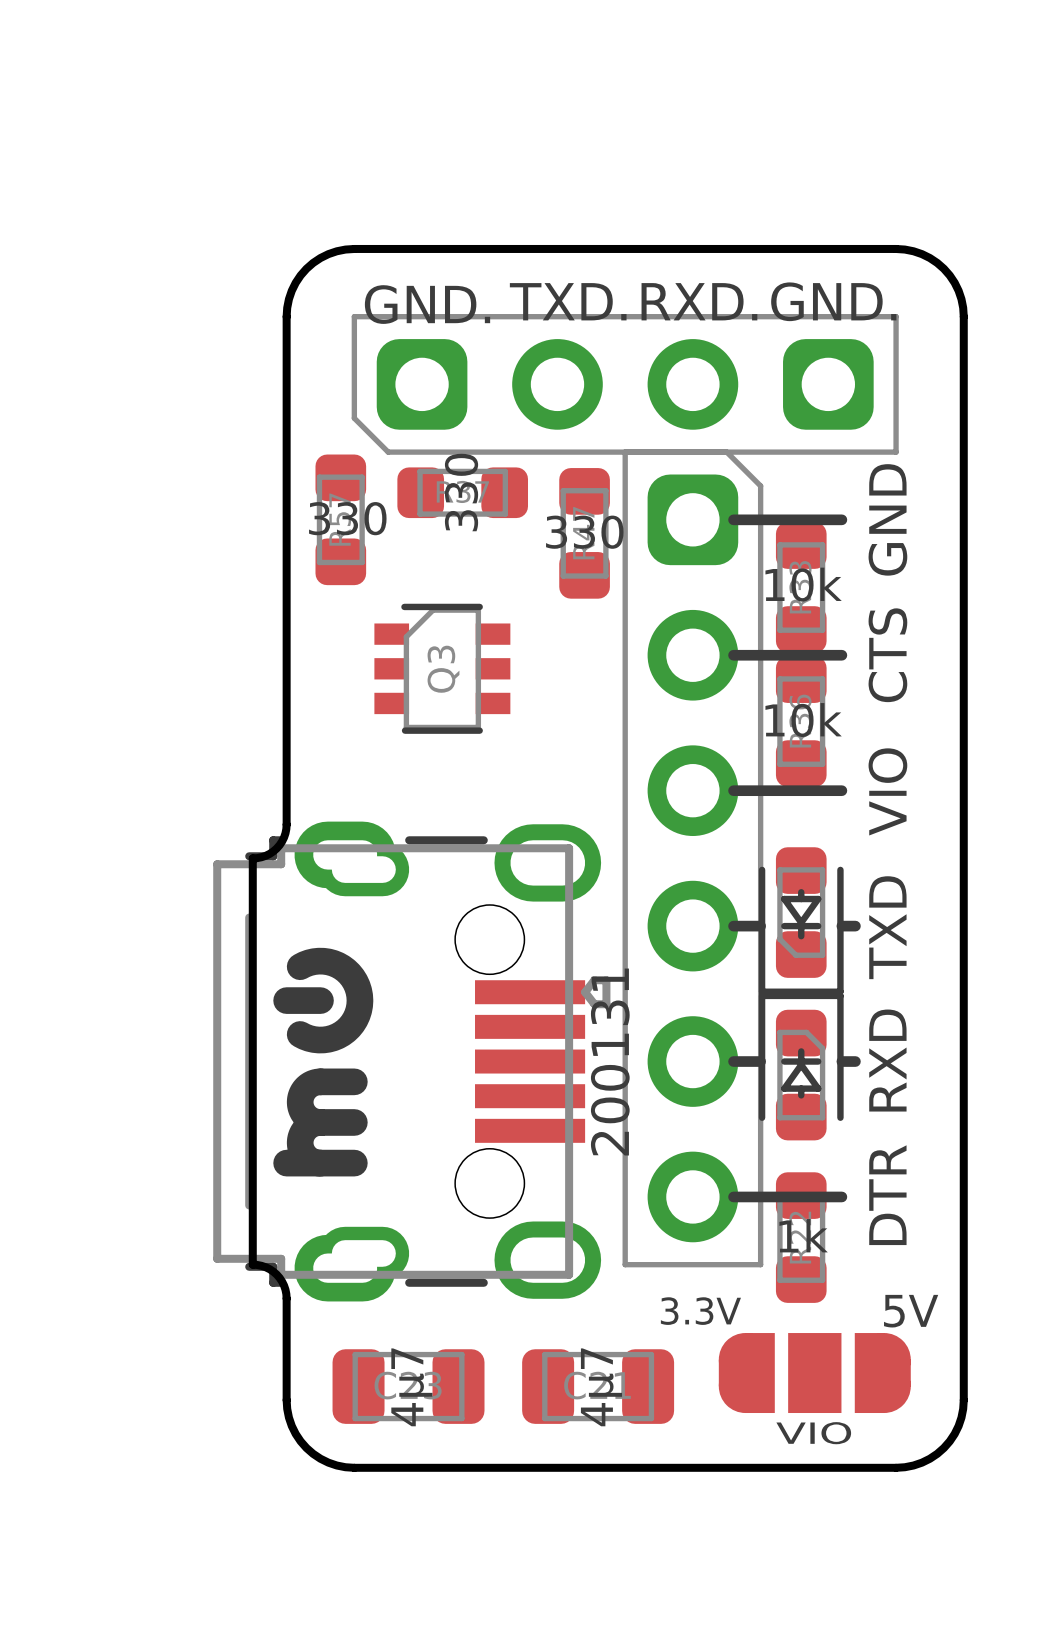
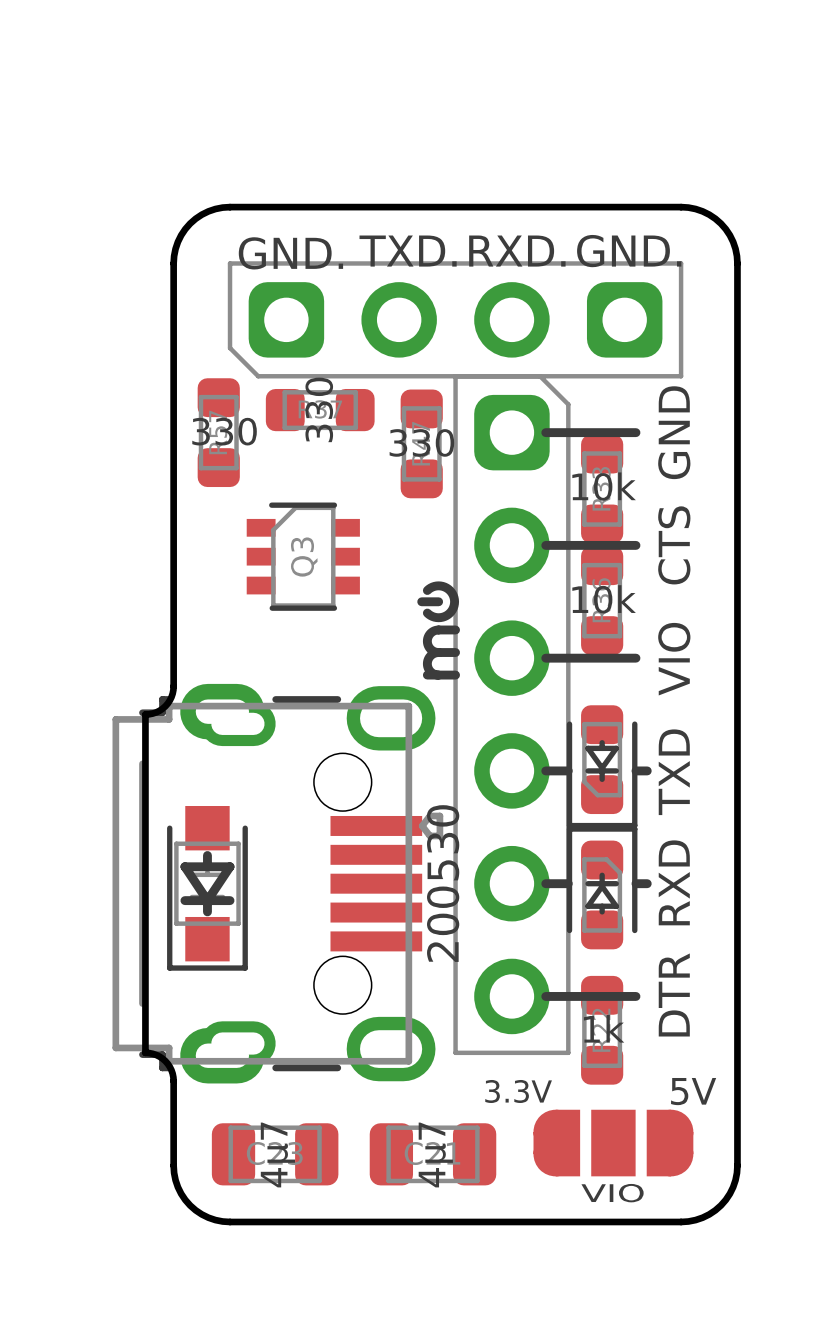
drawing: none -> [417, 581, 460, 680]
drawing: [273, 947, 374, 1177] -> none
text: 200131 (610, 1062) -> 200530 (443, 883)
part: none -> (207, 888)

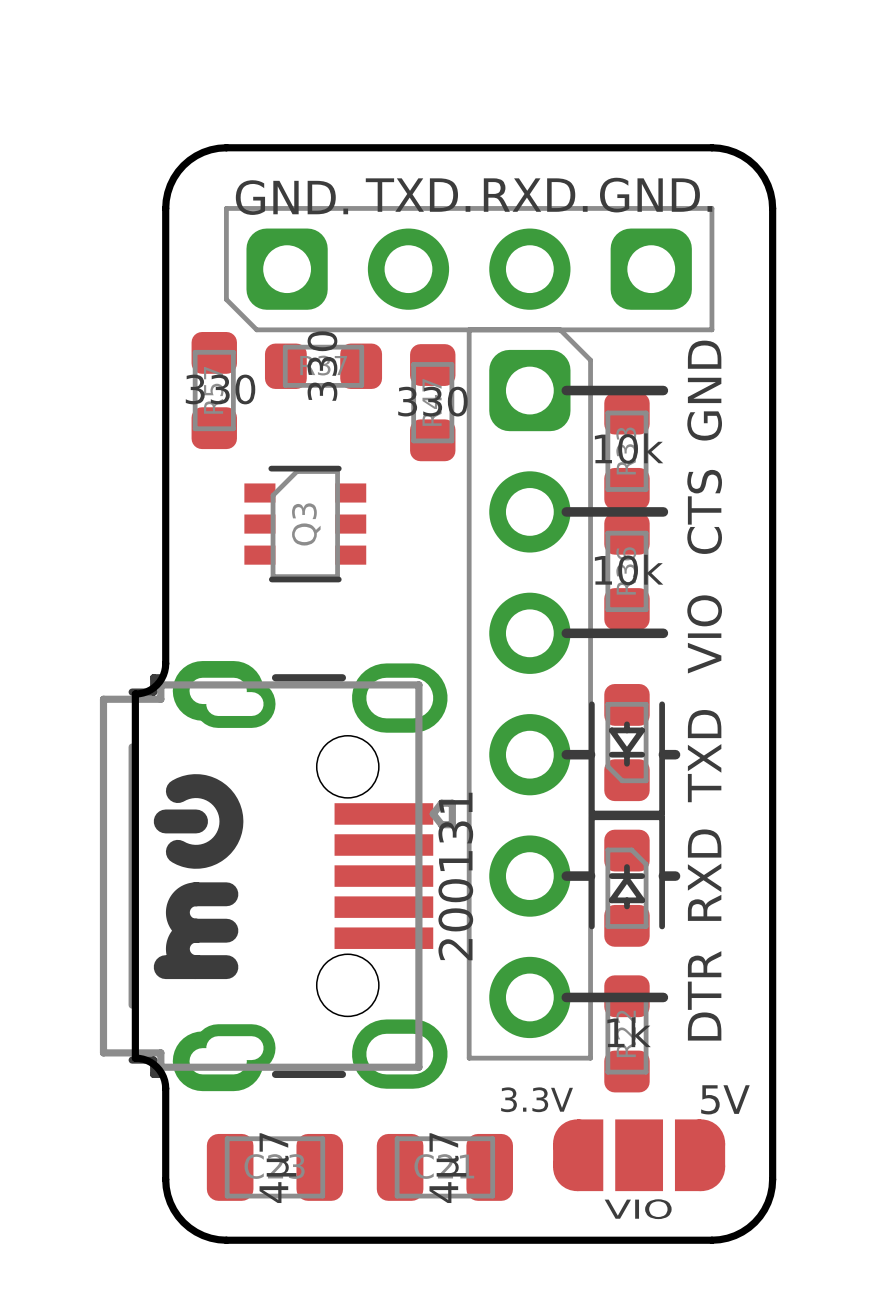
drawing: [417, 581, 460, 680] -> none
drawing: none -> [153, 774, 244, 980]
text: 200530 (443, 883) -> 200131 (455, 876)
part: (207, 888) -> none

